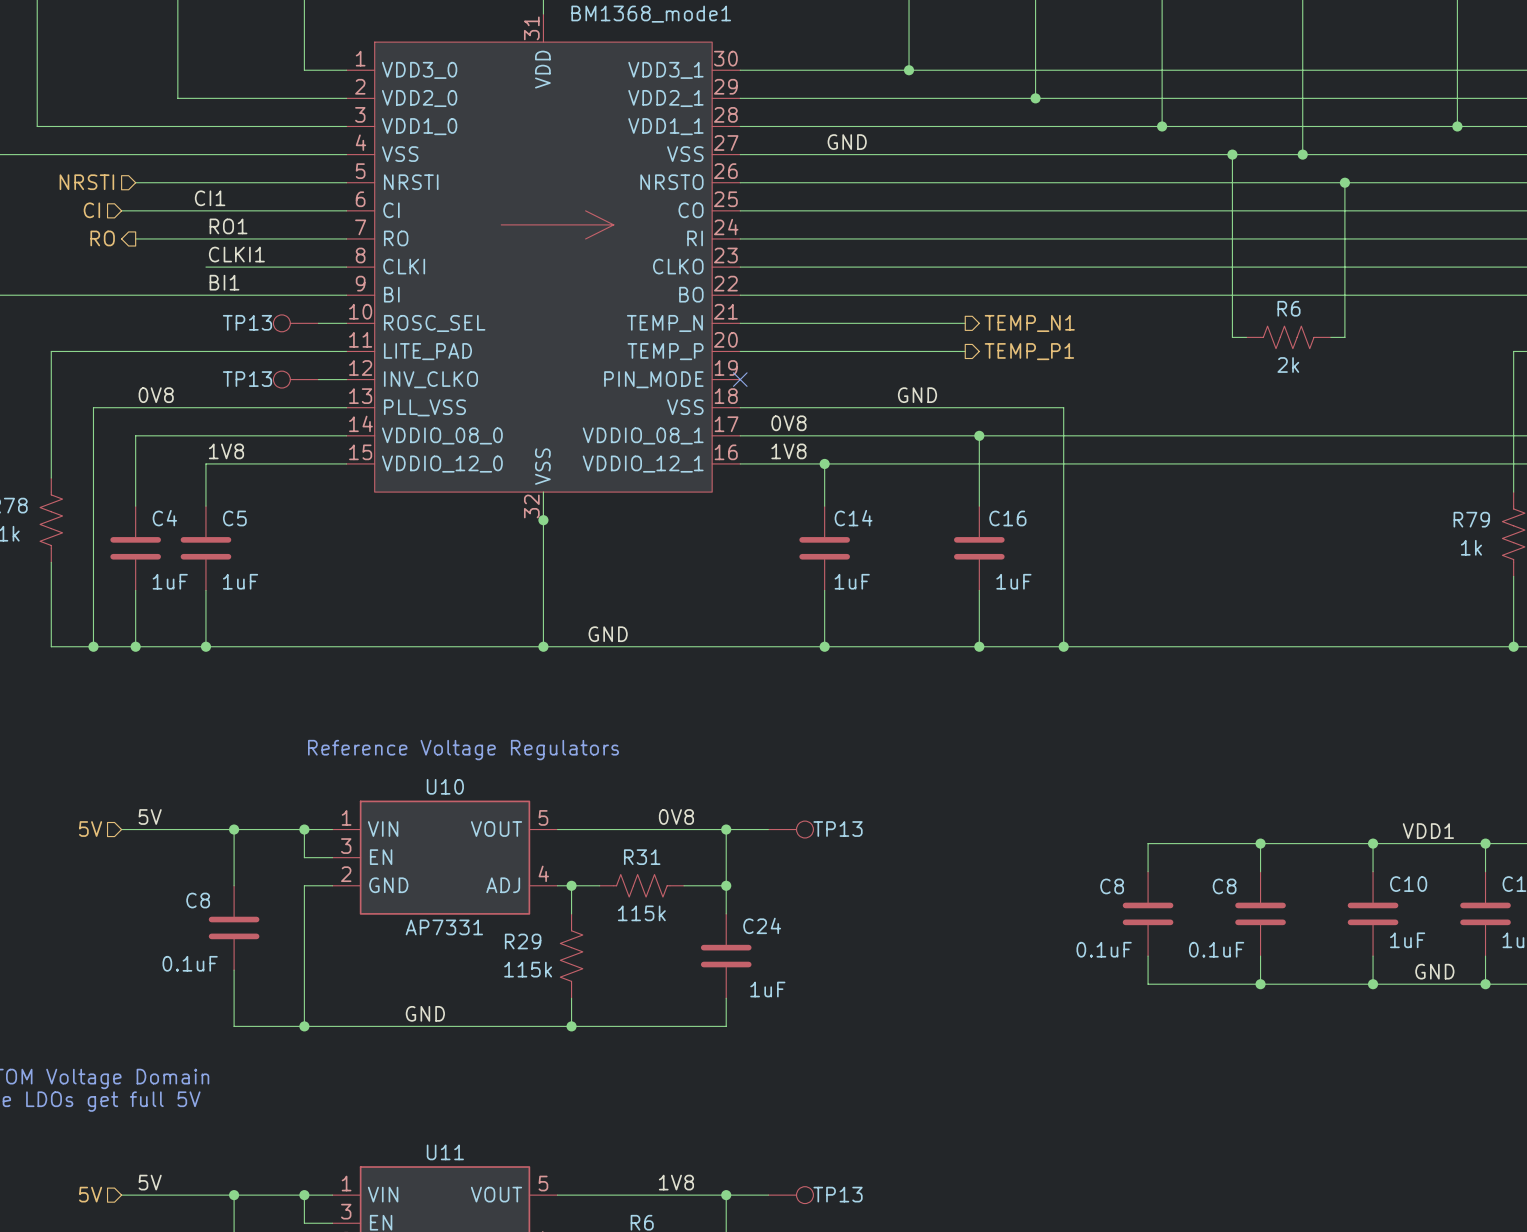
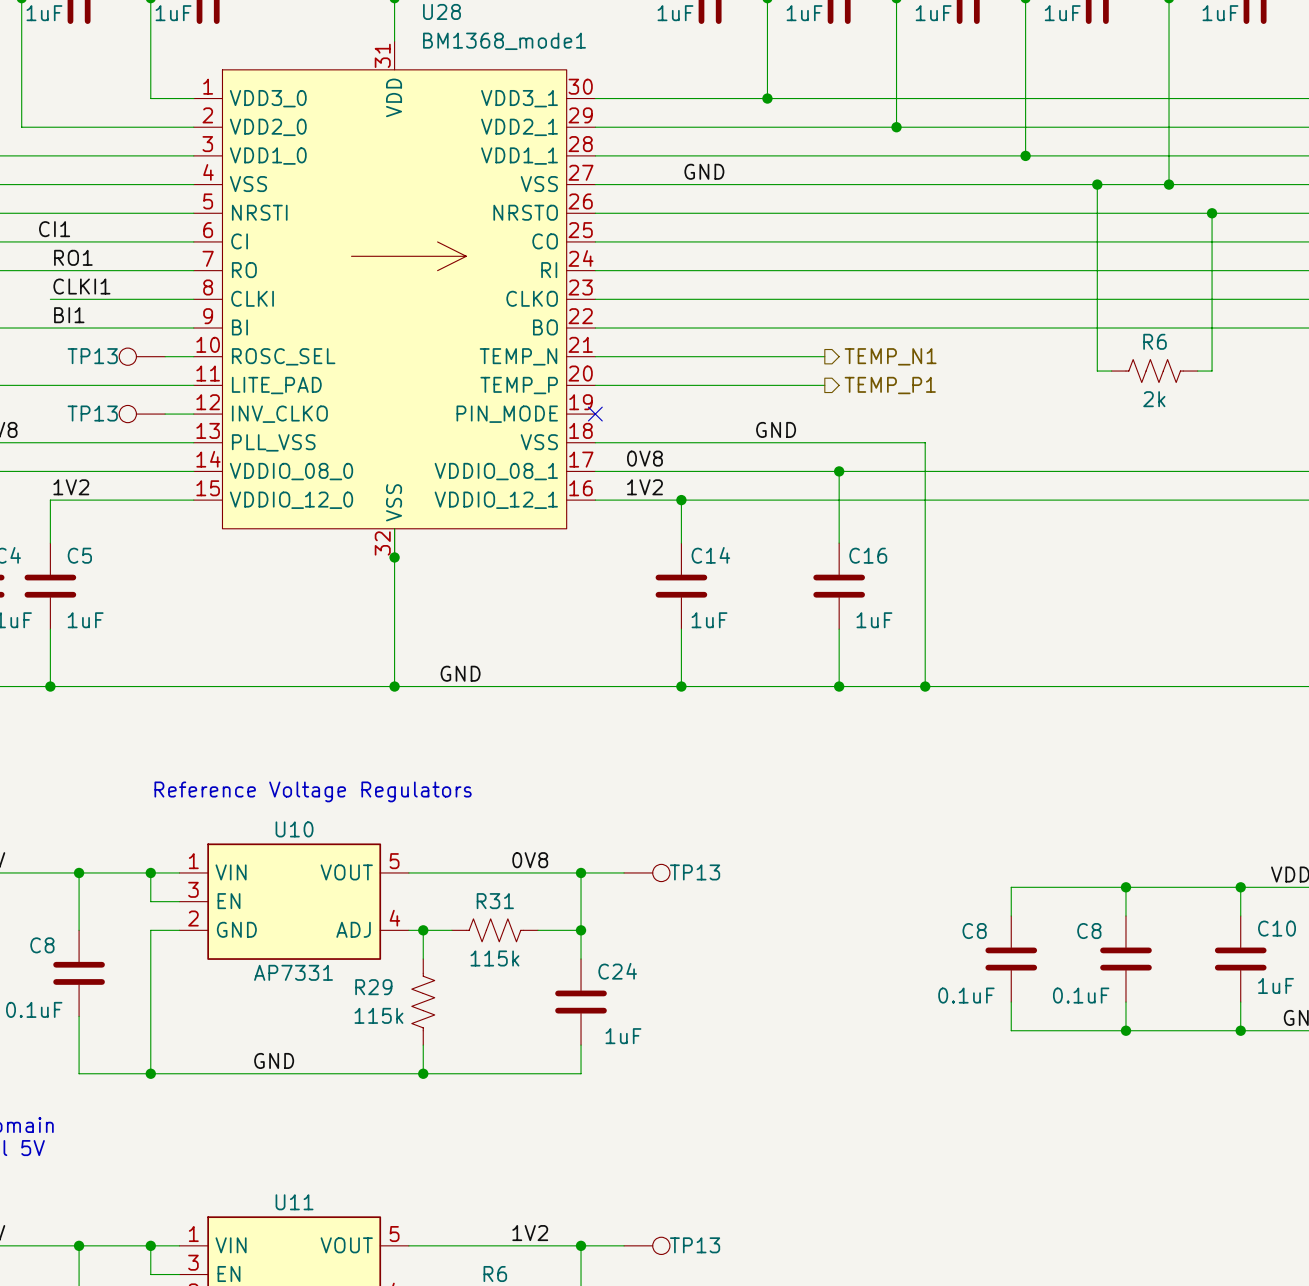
label: 1V8 (226, 451) -> 1V2 (71, 487)
label: 1V8 (788, 451) -> 1V2 (644, 487)
label: 1V8 (676, 1182) -> 1V2 (530, 1233)

